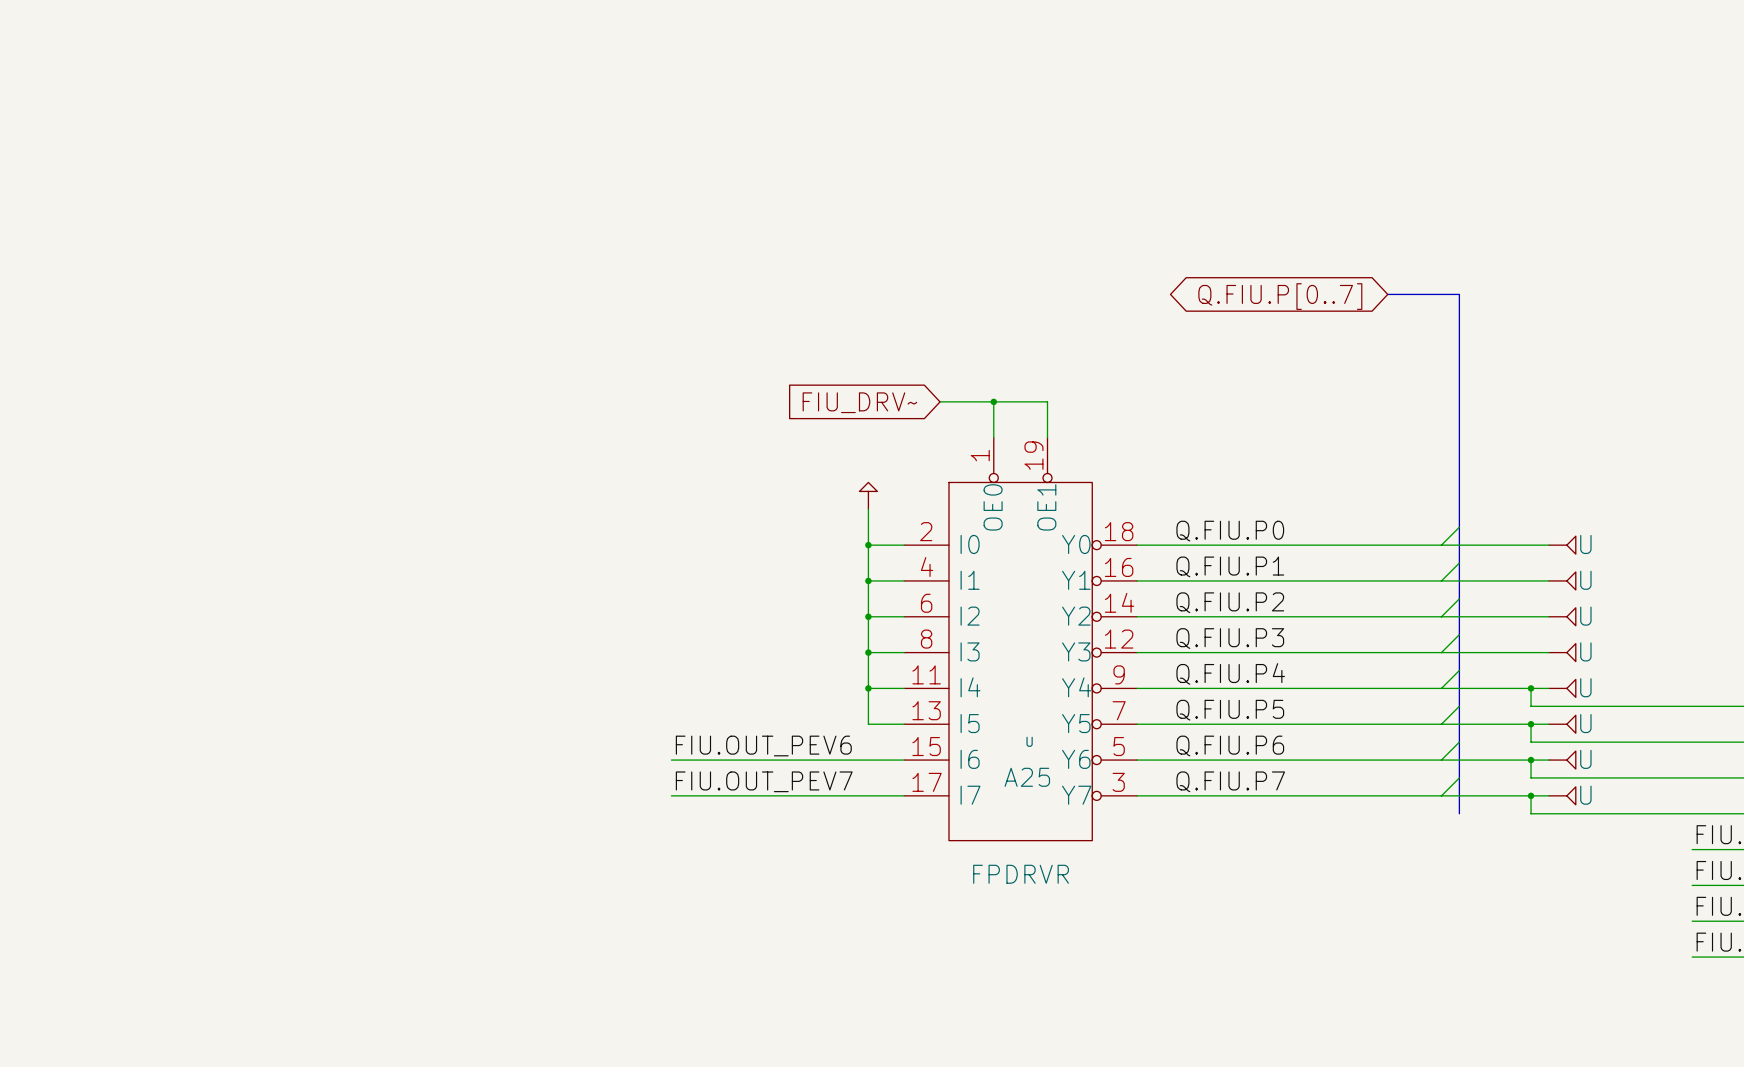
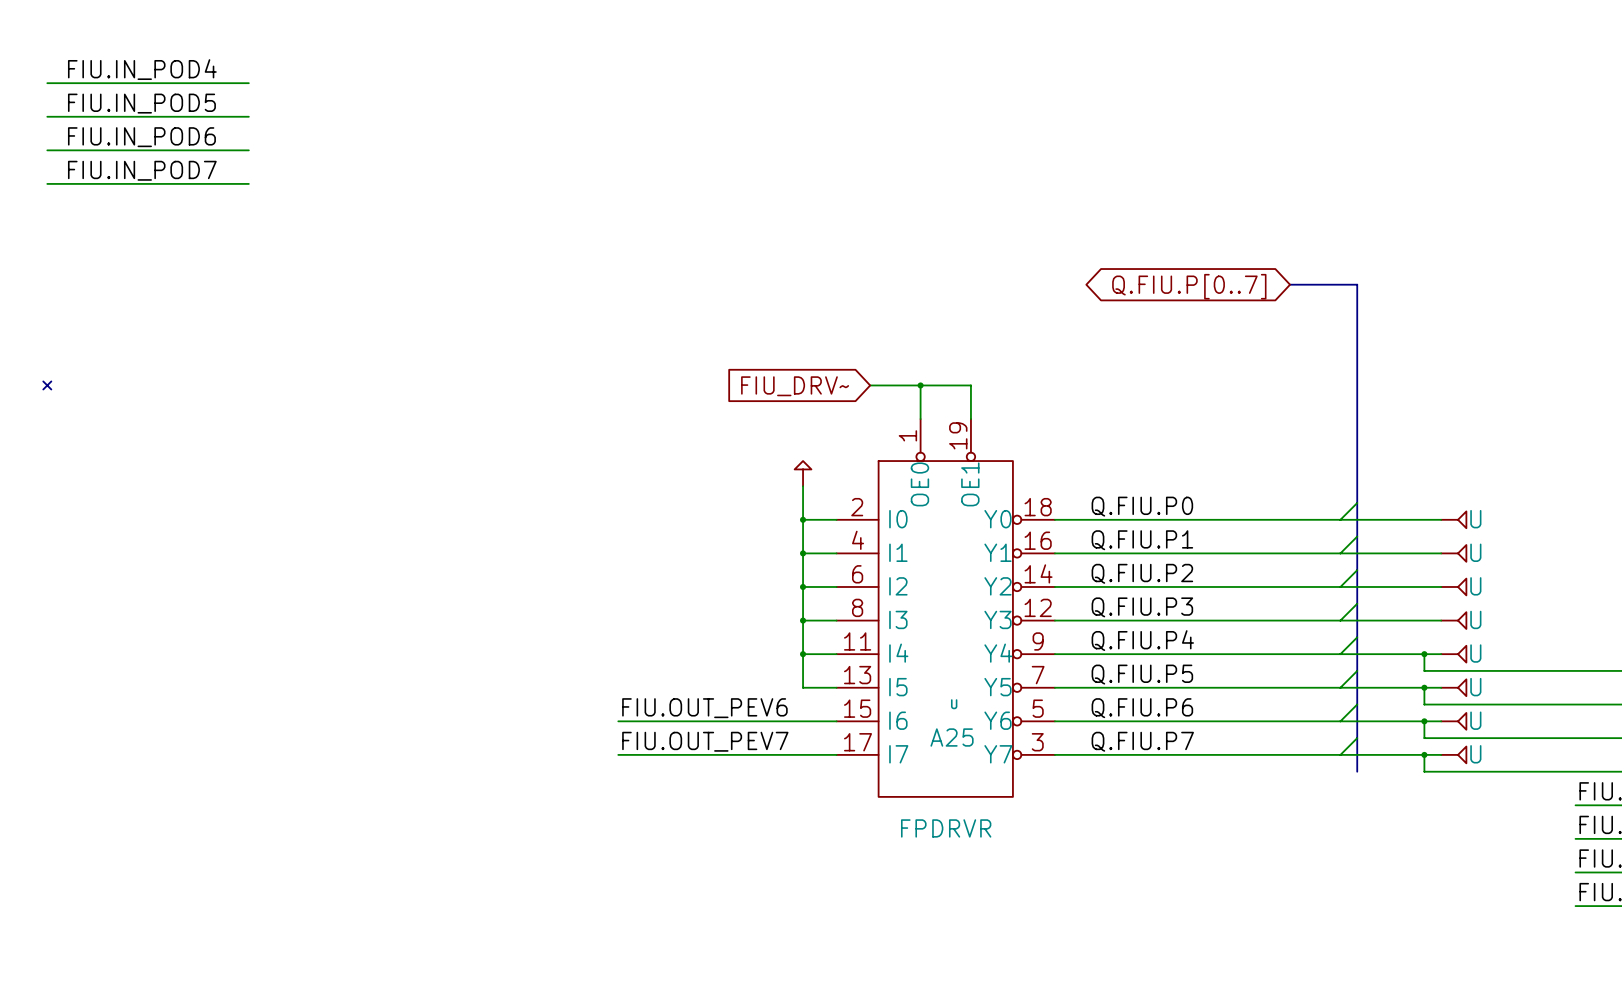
label: none -> FIU.IN_POD4 (142, 69)
wire: none -> (47, 83) (248, 83)
label: none -> FIU.IN_POD5 (141, 103)
wire: none -> (47, 116) (248, 116)
label: none -> FIU.IN_POD6 (141, 137)
wire: none -> (47, 150) (248, 150)
label: none -> FIU.IN_POD7 (142, 170)
wire: none -> (47, 183) (248, 183)
no-connect mark: none -> (47, 385)

